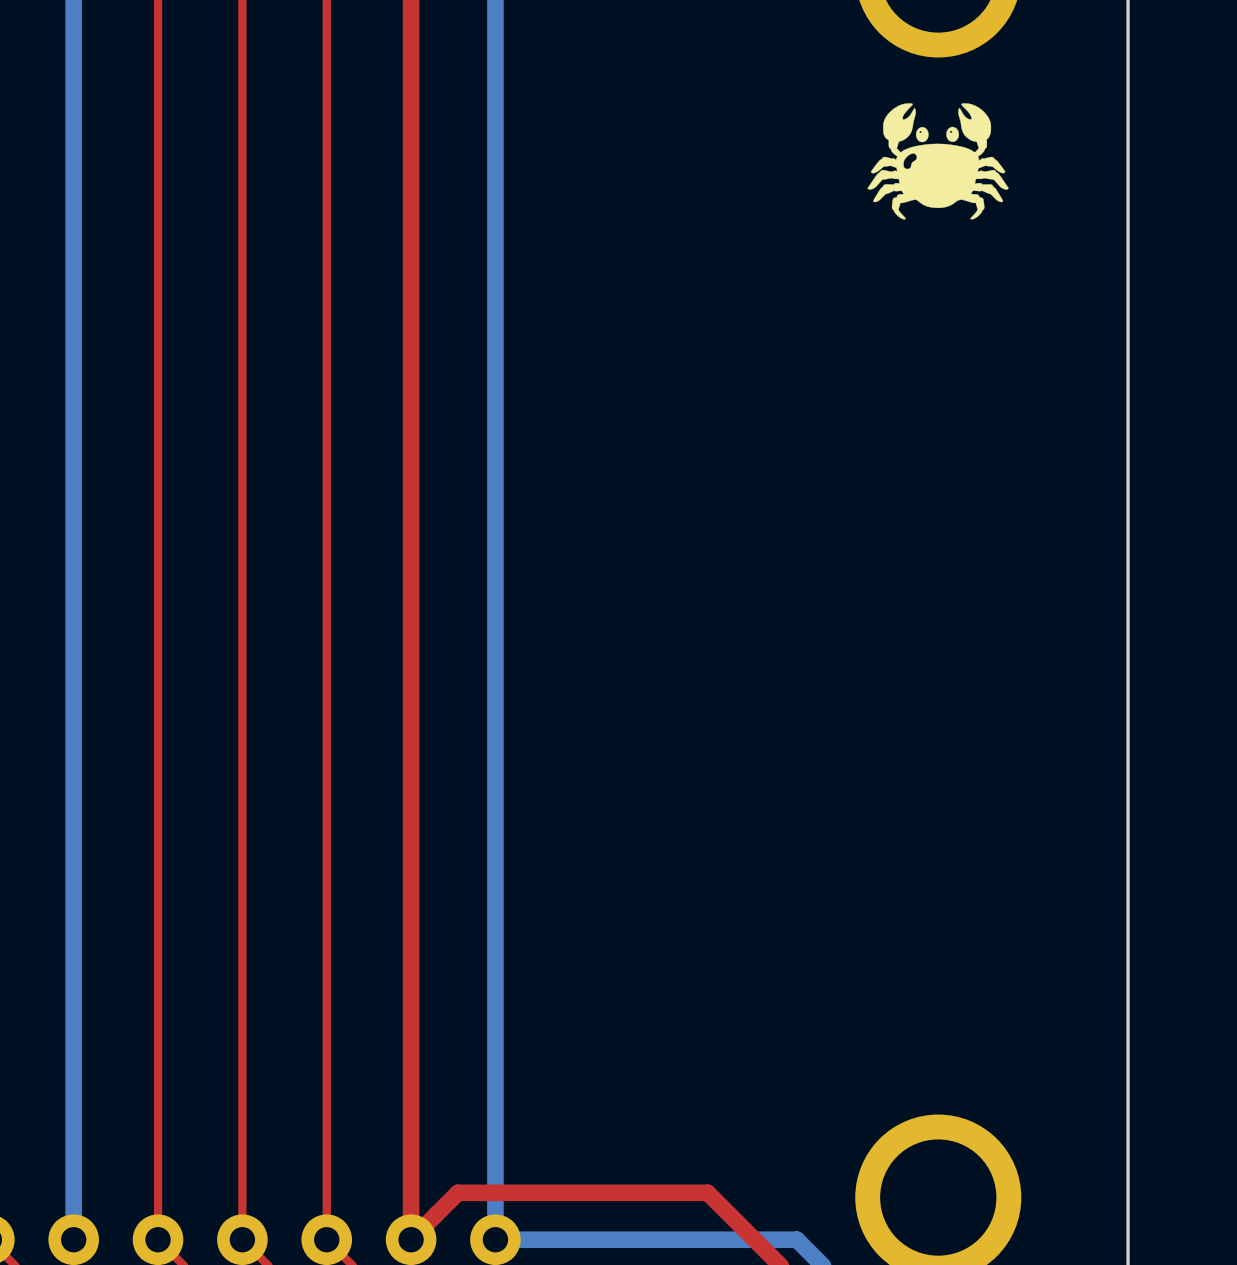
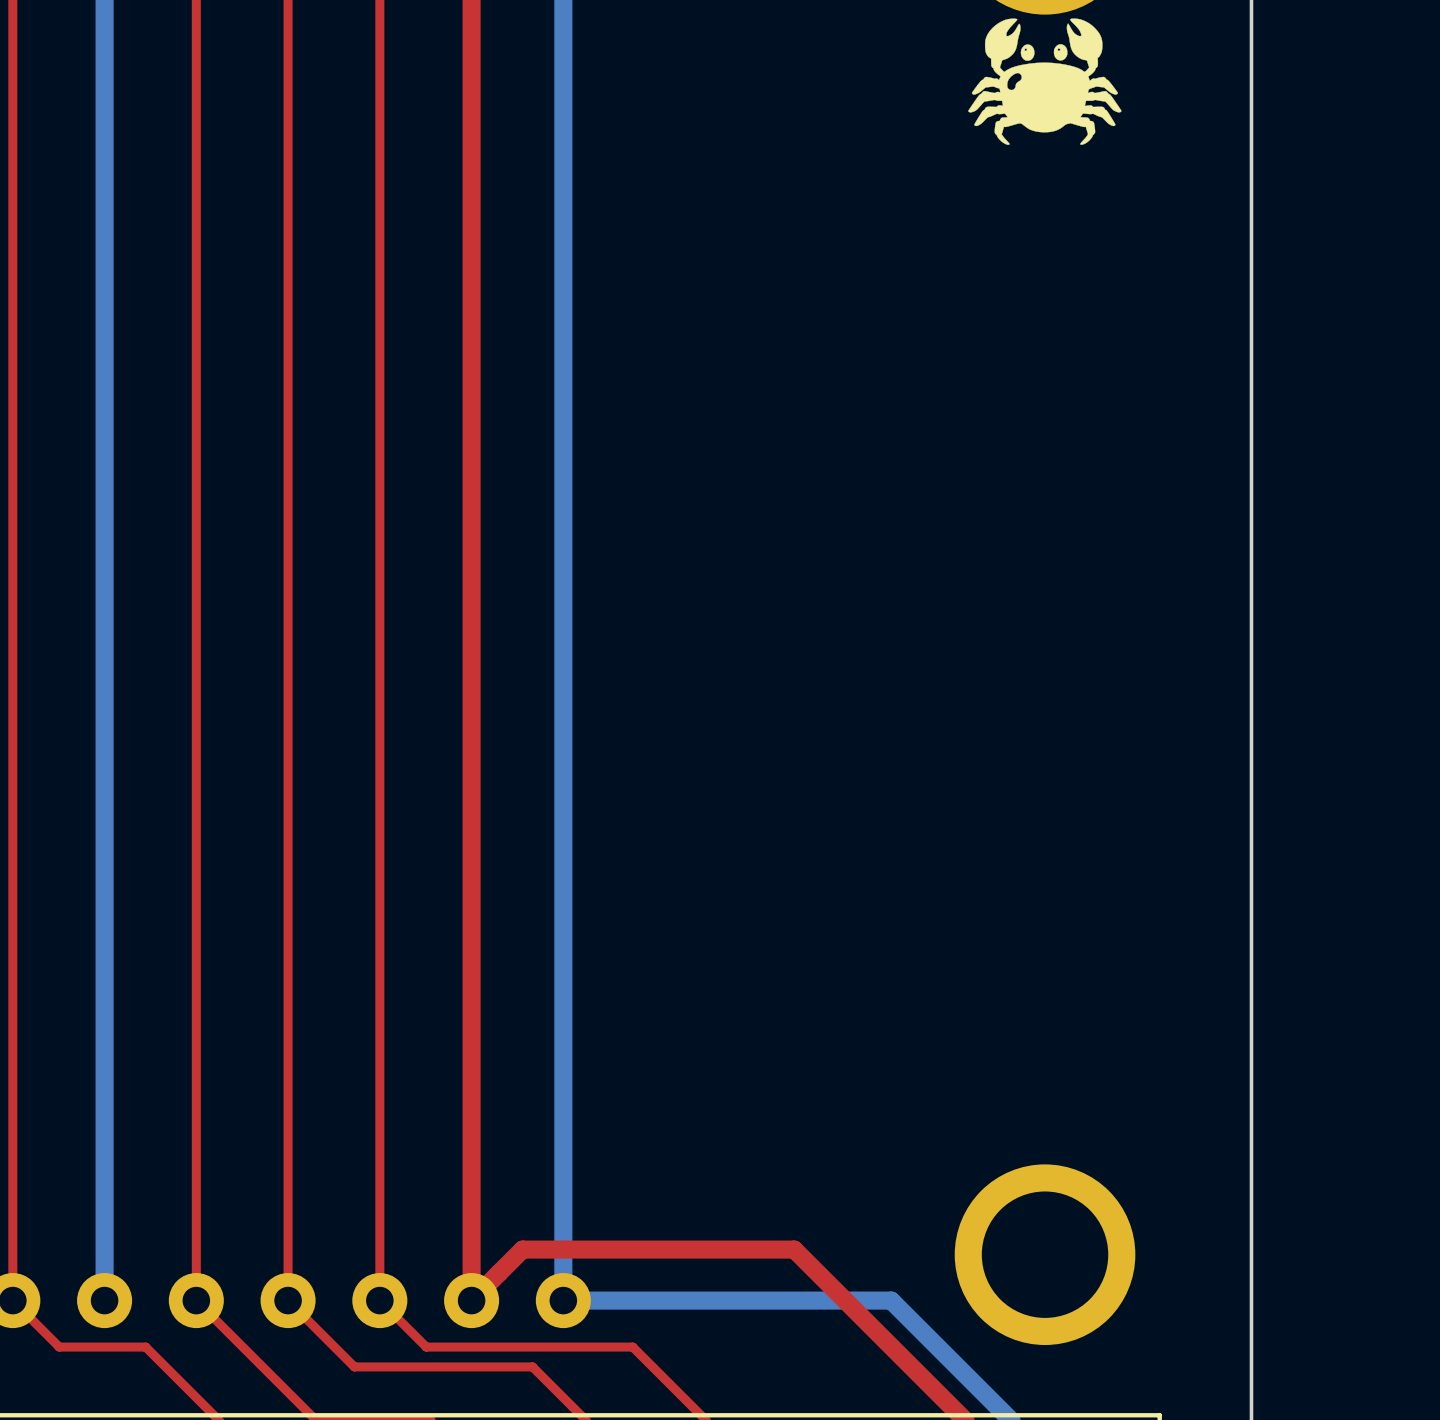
drawing position: (938, 161) -> (1044, 81)

